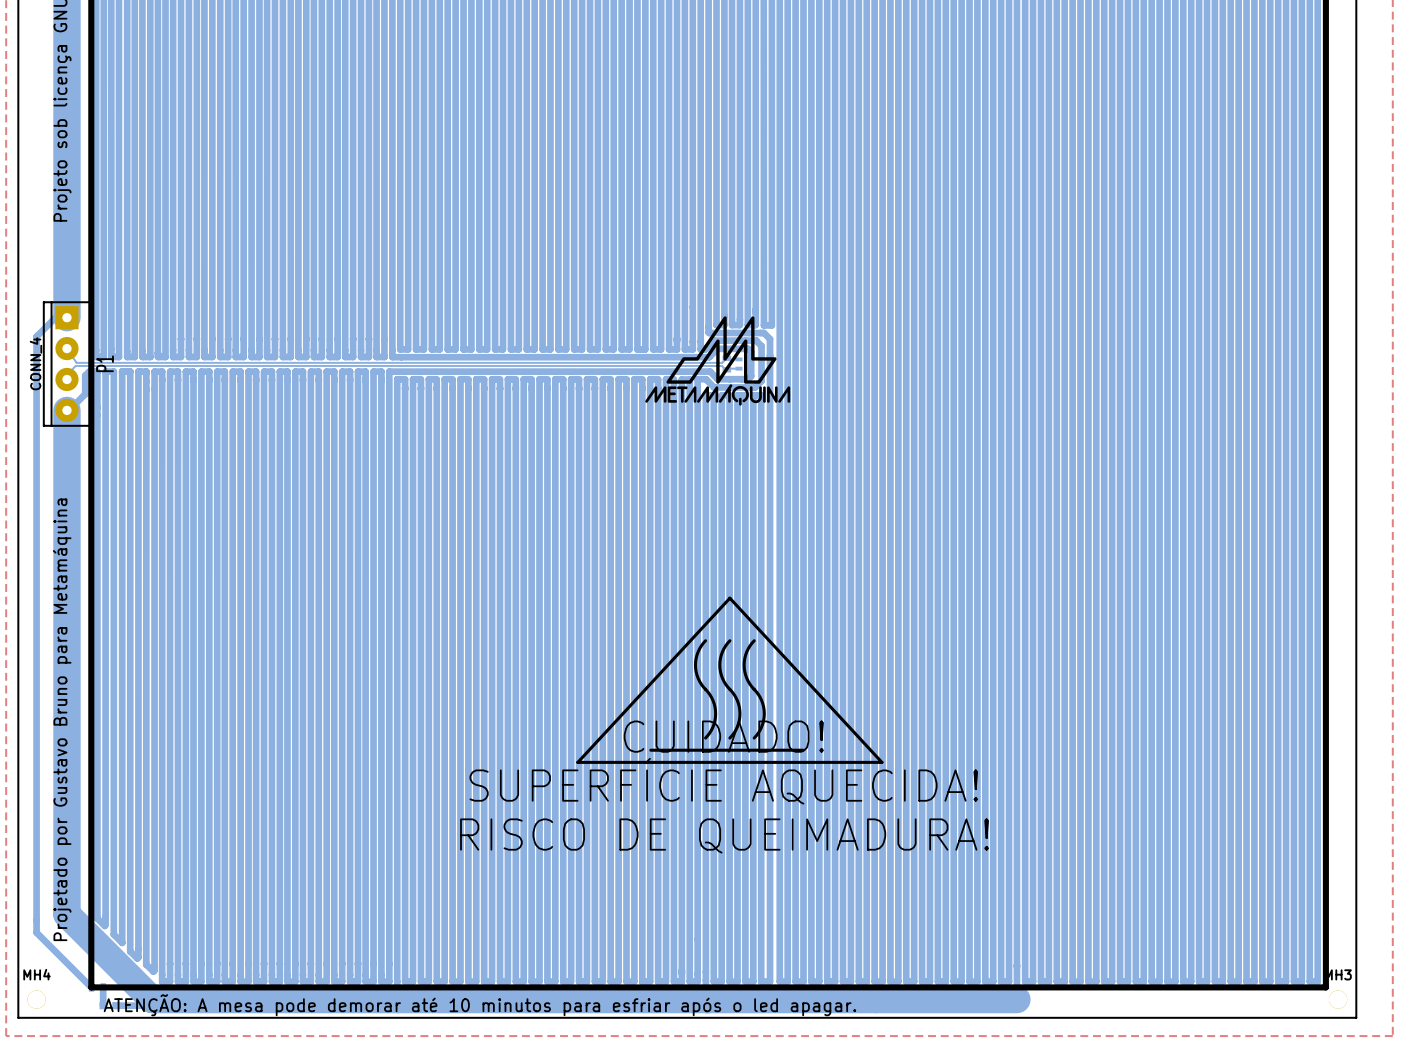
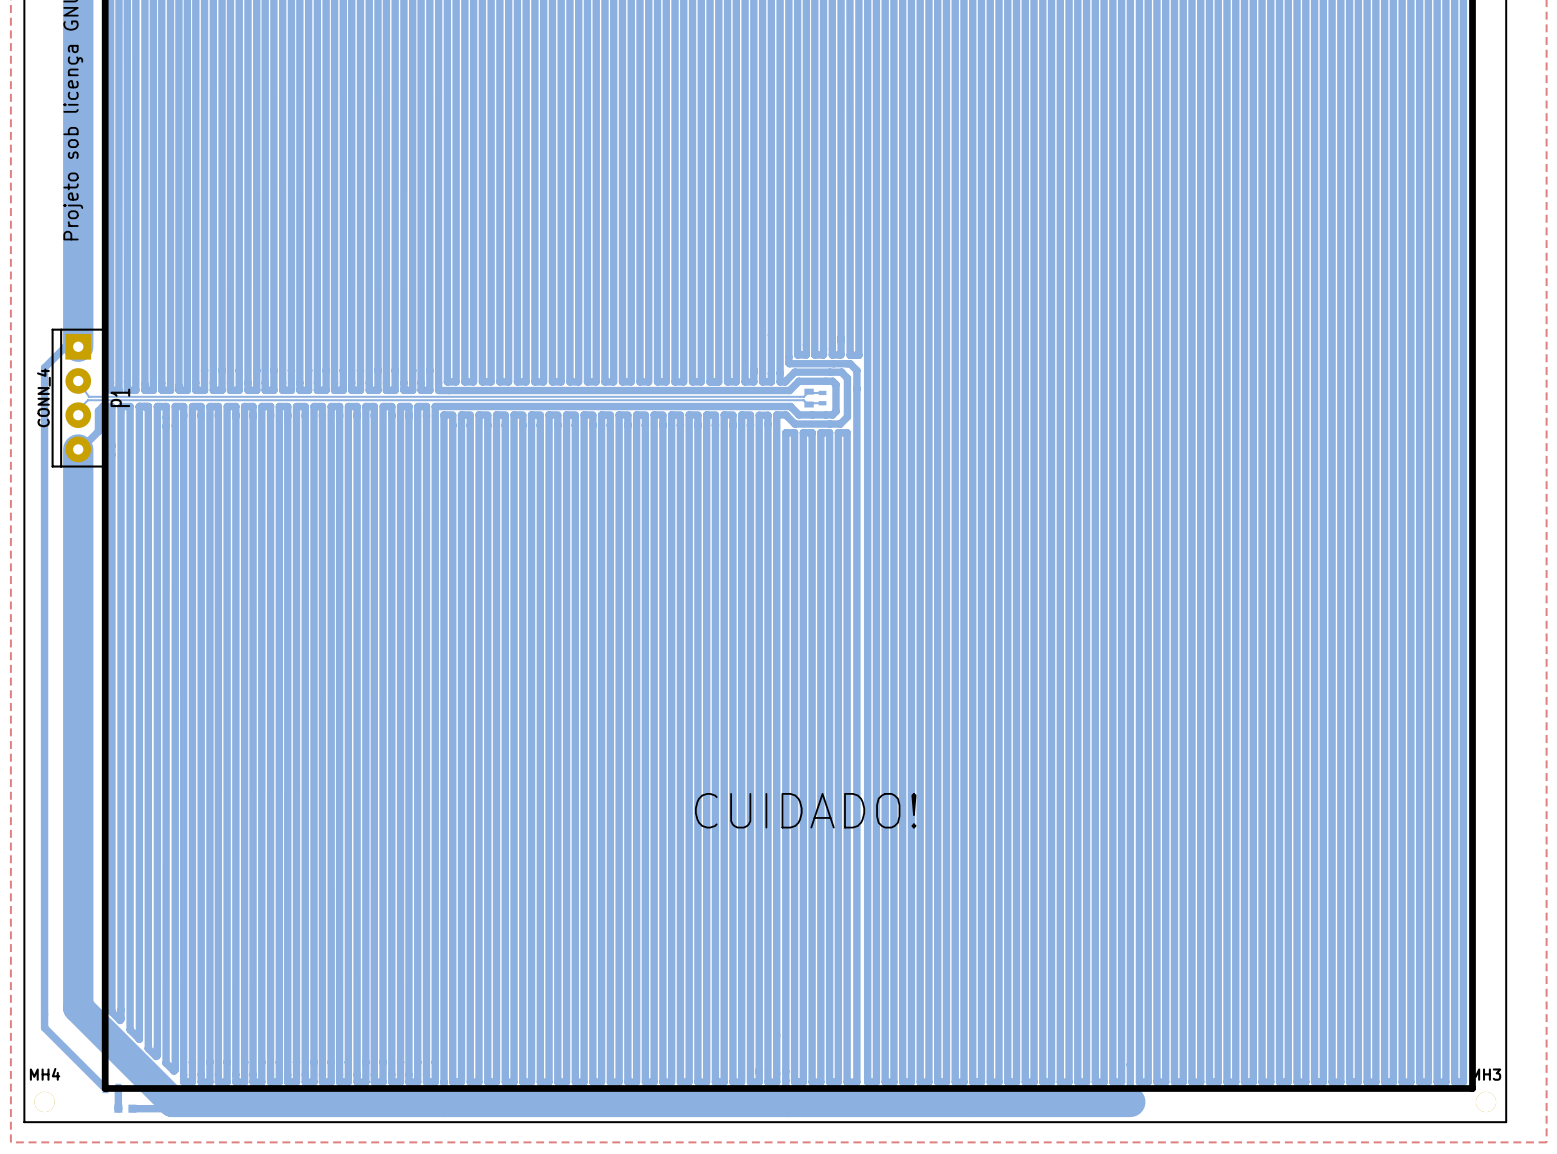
drawing: [645, 316, 791, 406] -> none
line: (729, 598) (577, 762) (881, 762) (729, 598) -> none
line: (705, 640) (698, 651) (695, 665) (698, 678) (711, 697) (715, 710) (713, 726) (705, 738) -> none
line: (729, 640) (722, 651) (719, 665) (722, 678) (735, 697) (739, 710) (737, 726) (729, 738) -> none
line: (754, 640) (746, 651) (744, 665) (746, 678) (760, 697) (764, 710) (761, 726) (754, 738) -> none
text: Projetado por Gustavo Bruno para Metamáquina (62, 719) -> none
line: (650, 750) (802, 750) -> none
text: SUPERFÍCIE AQUECIDA! (723, 781) -> none
text: RISCO DE QUEIMADURA! (724, 835) -> none
text: ATENÇÃO: A mesa pode demorar até 10 minutos para esfriar após o led apagar. (479, 1005) -> none

